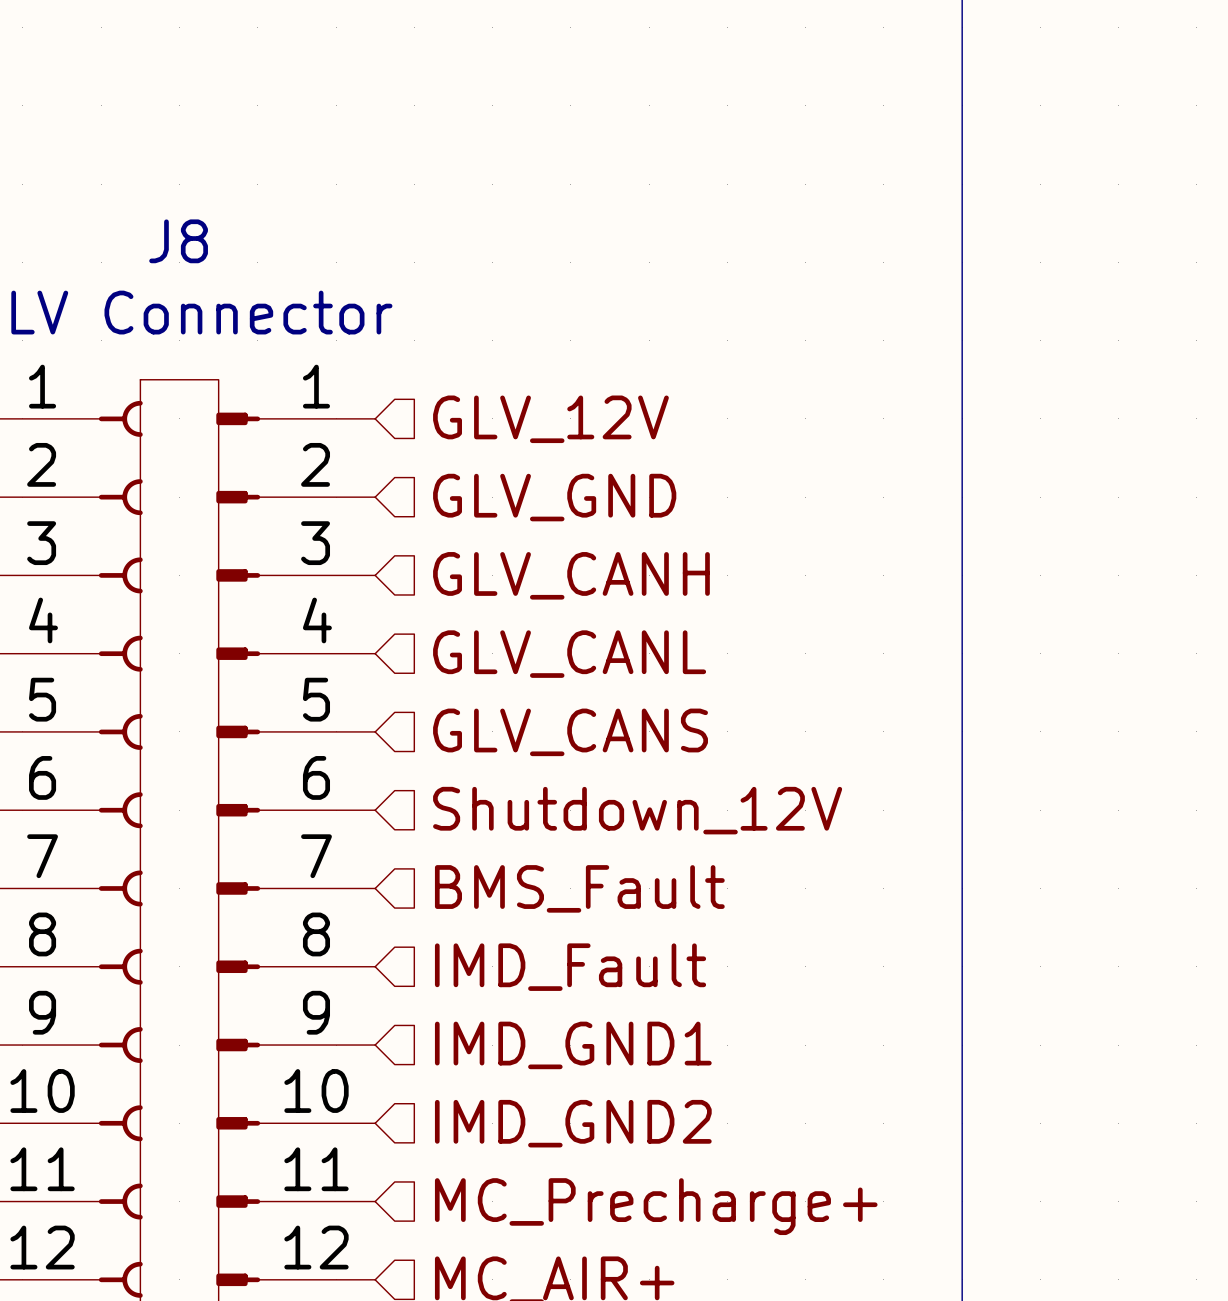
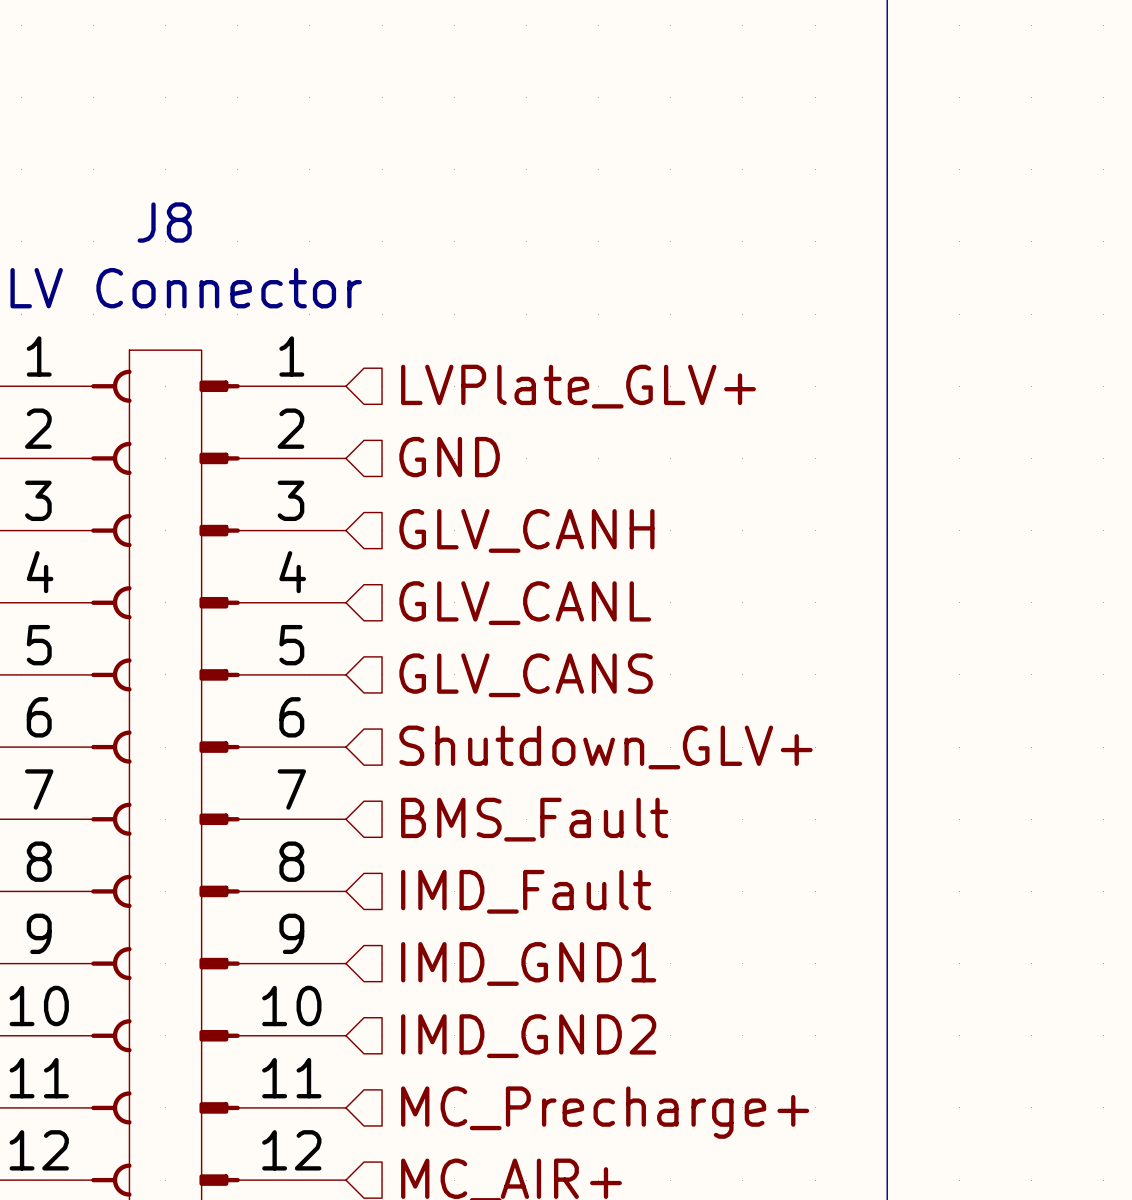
hierarchical label: GLV_12V (550, 419) -> LVPlate_GLV+ (578, 386)
hierarchical label: GLV_GND (554, 497) -> GND (449, 457)
hierarchical label: Shutdown_12V (637, 810) -> Shutdown_GLV+ (605, 747)

